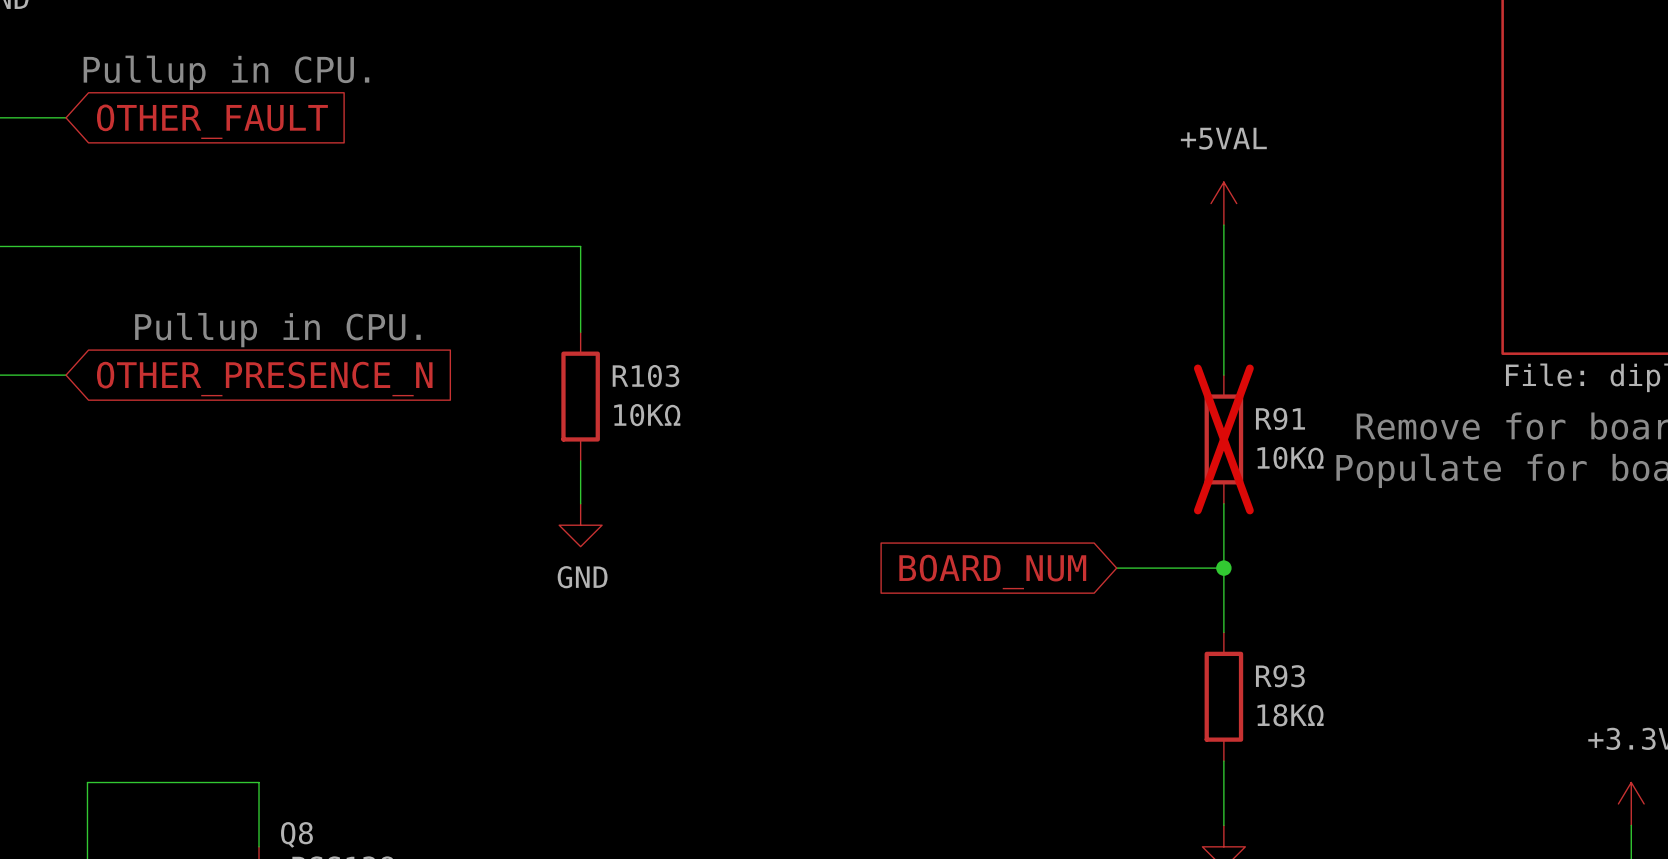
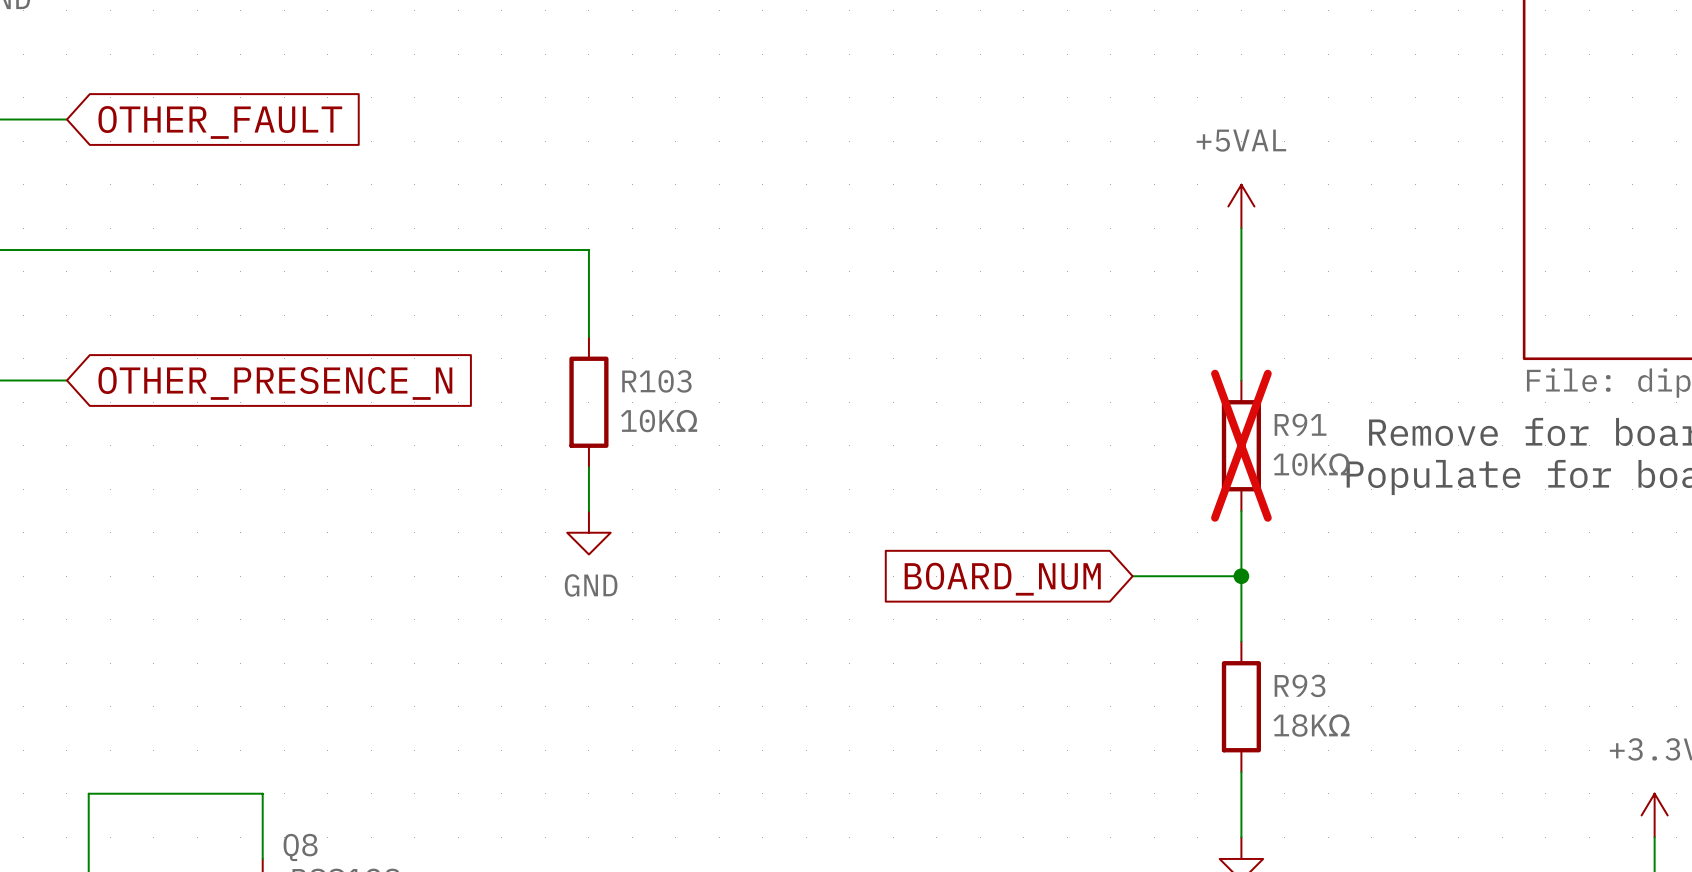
text: Pullup in CPU. (226, 72) -> none
text: Pullup in CPU. (277, 330) -> none

